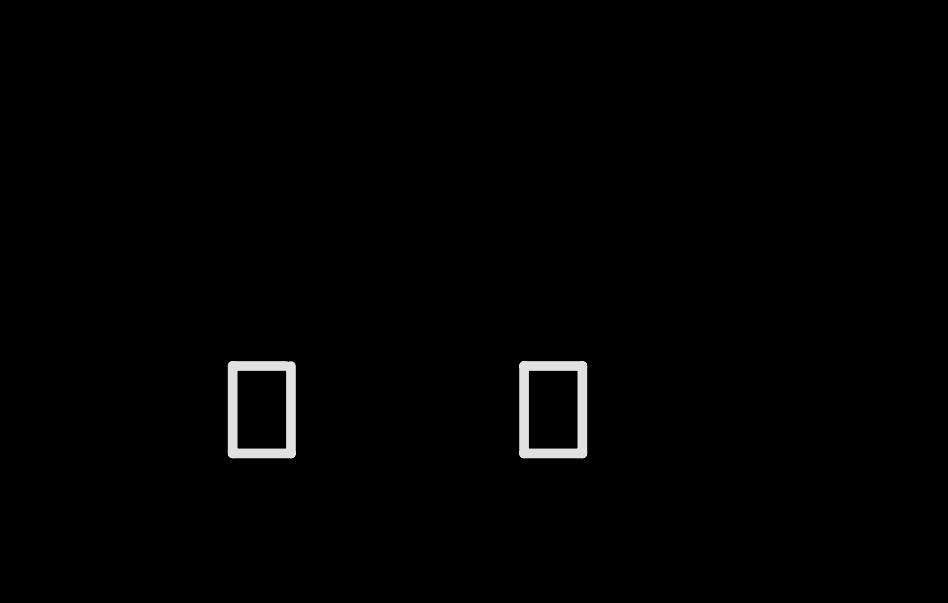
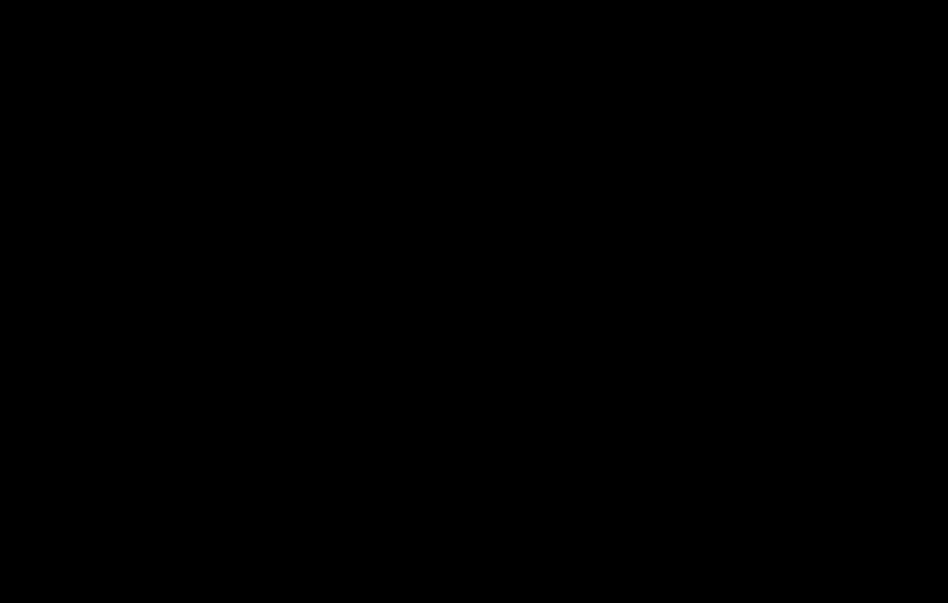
line: (286, 366) (232, 366) (232, 453) (290, 453) (290, 366) -> none
line: (524, 366) (524, 453) (582, 453) (582, 366) (524, 366) -> none

